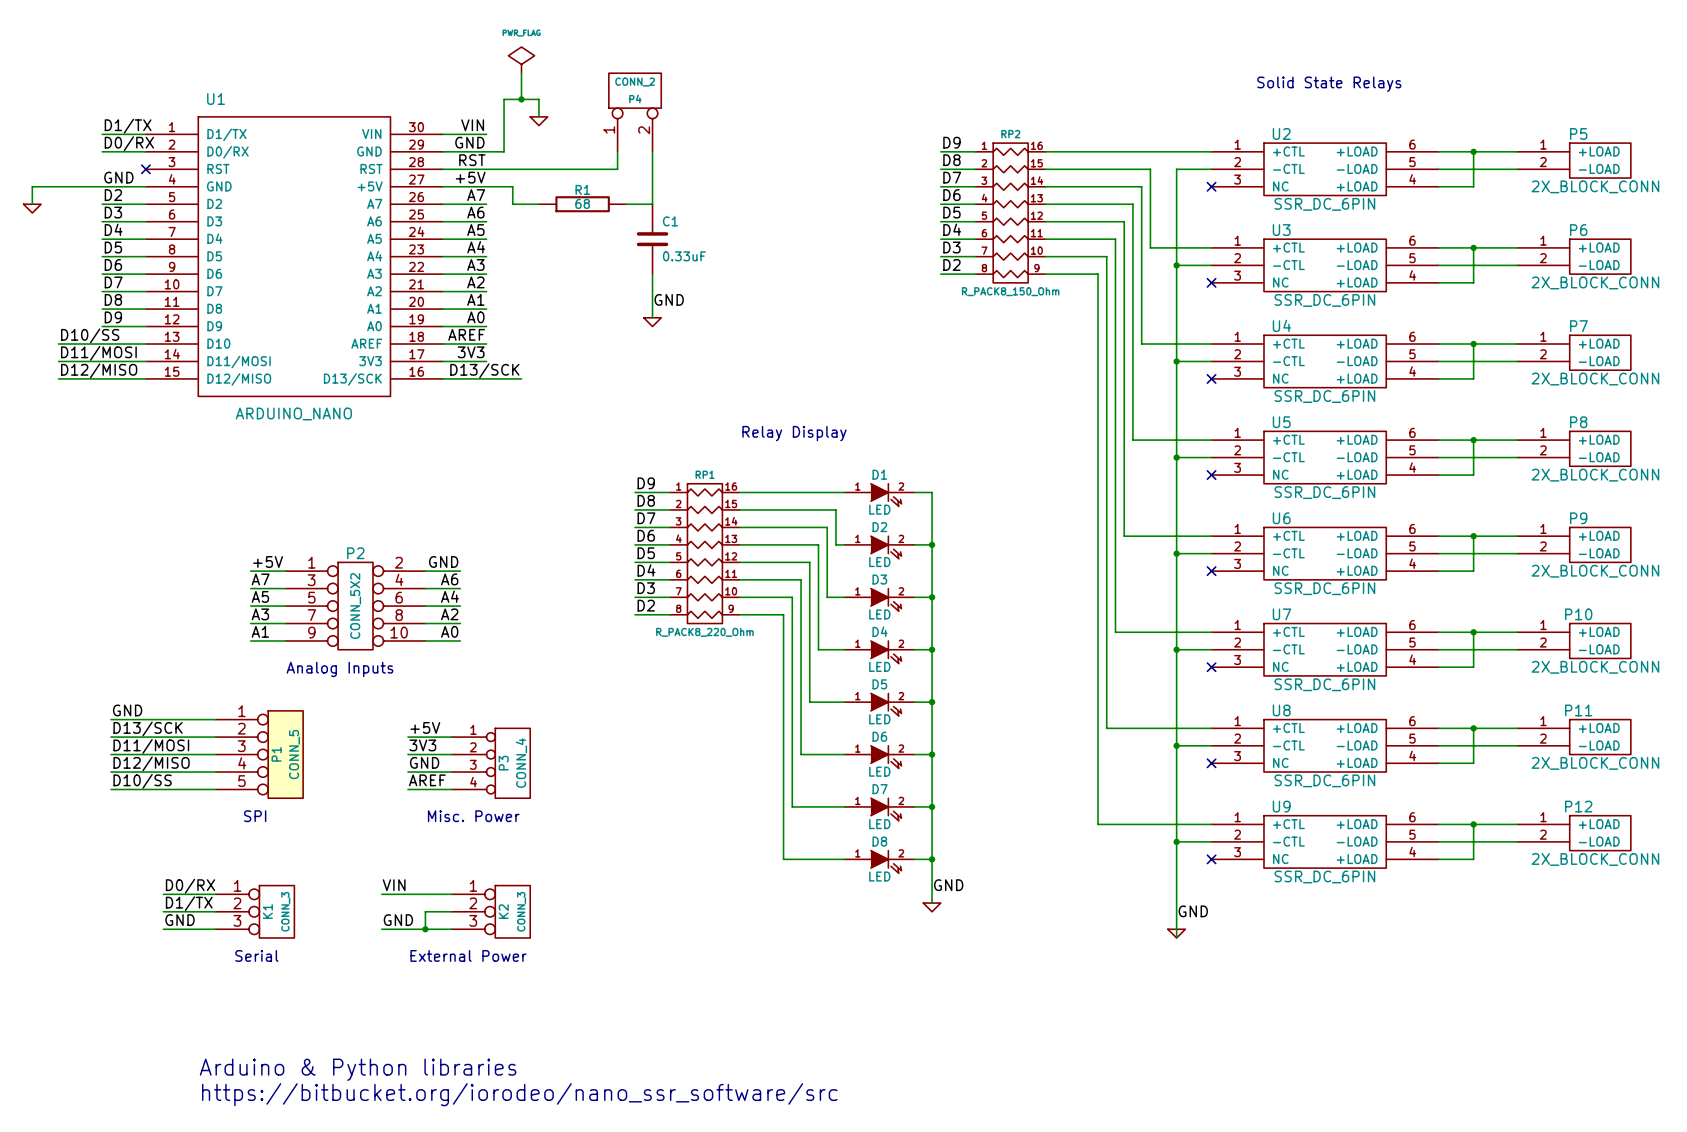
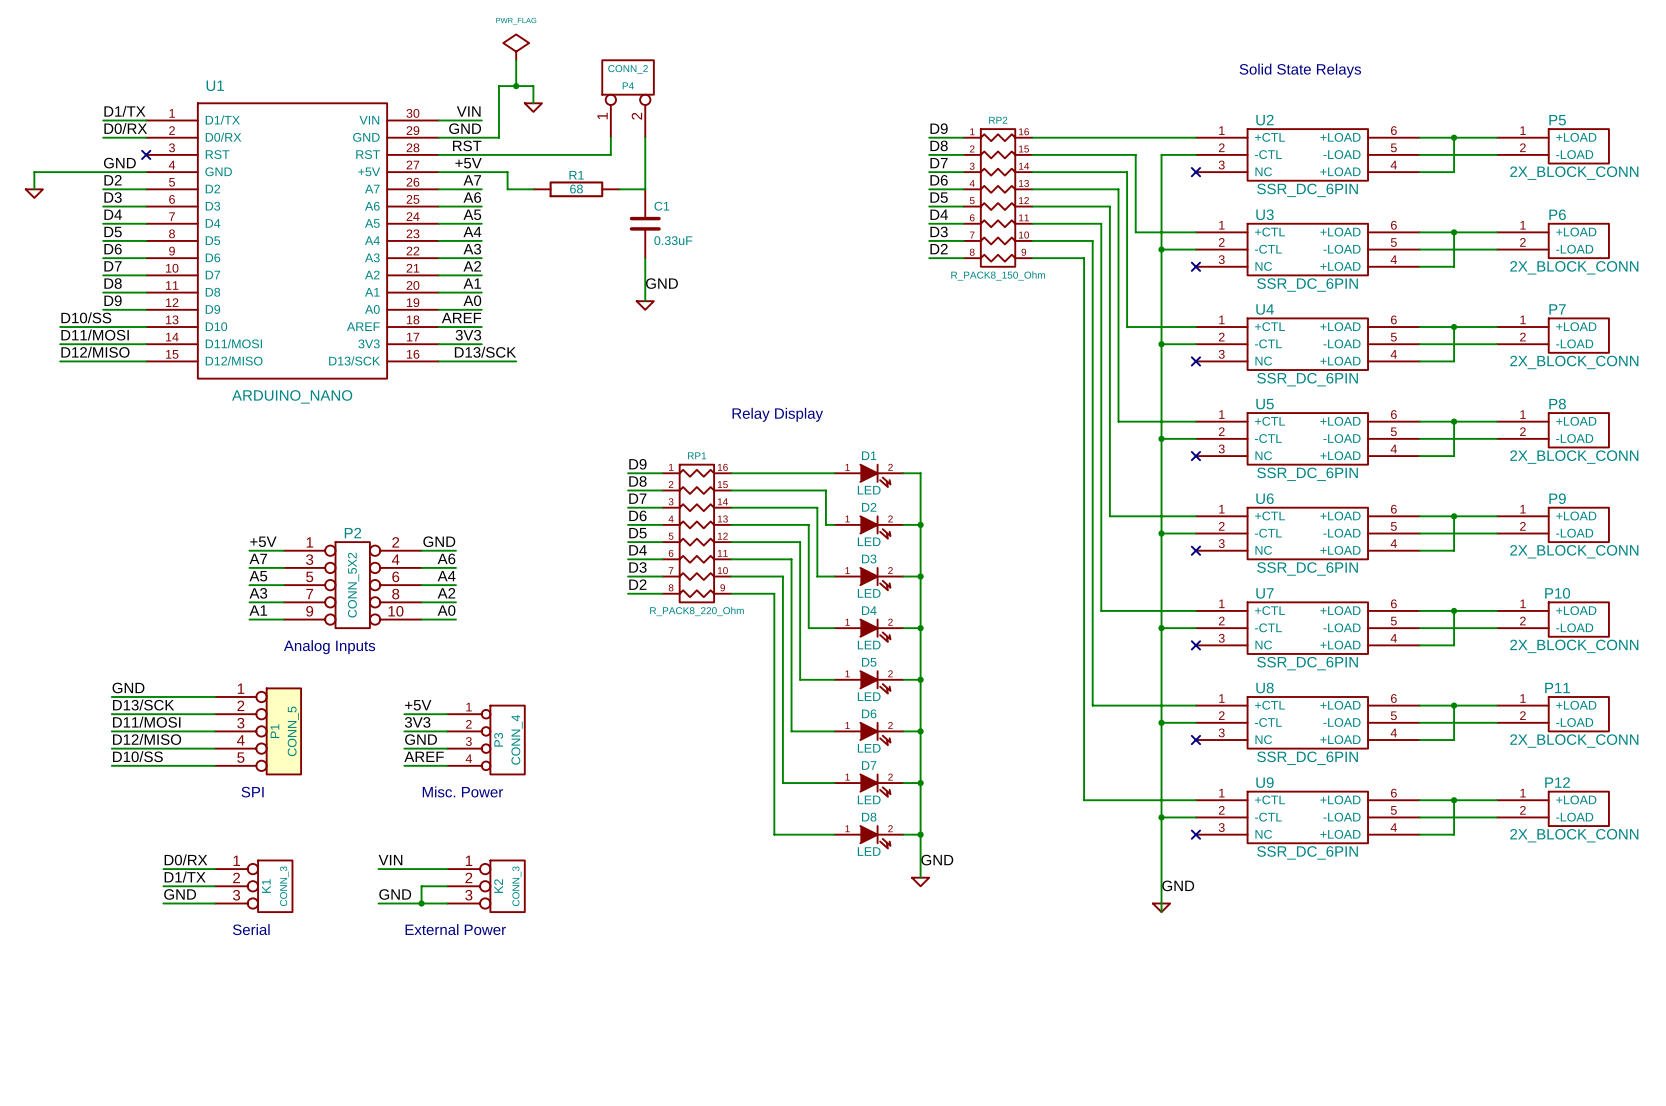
text: Arduino & Python libraries (358, 1069) -> none
text: https://bitbucket.org/iorodeo/nano_ssr_software/src (519, 1094) -> none

